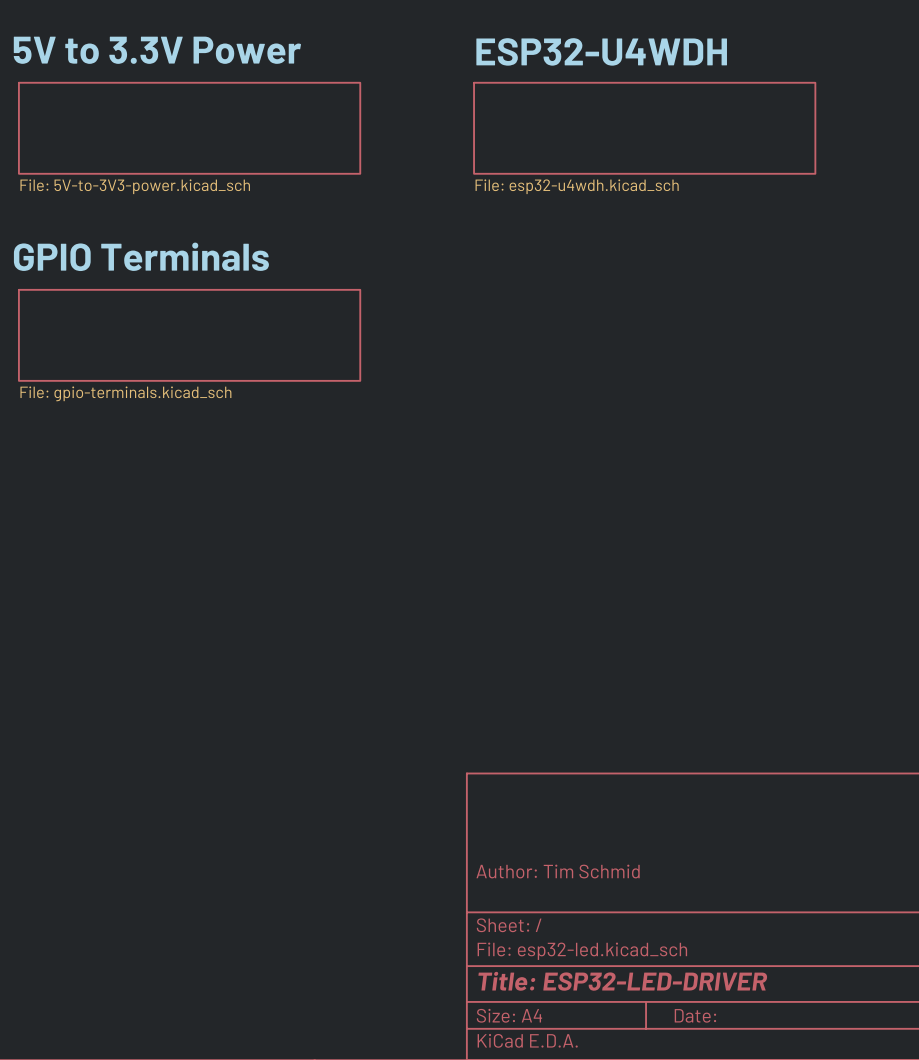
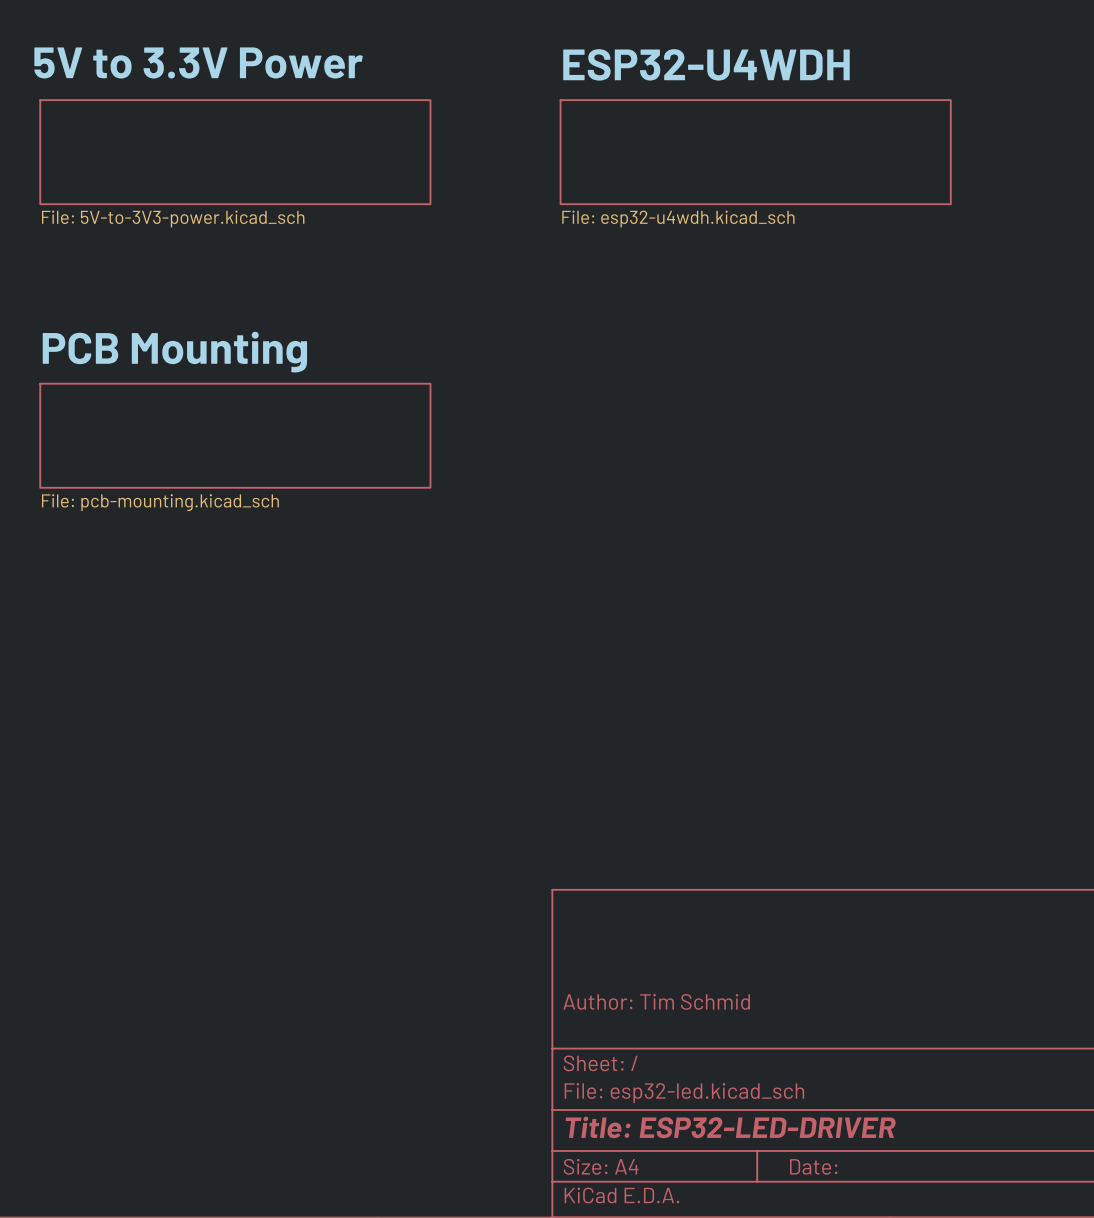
sheet GPIO Terminals: File: gpio-terminals.kicad_sch (189, 335) -> none
sheet PCB Mounting: none -> File: pcb-mounting.kicad_sch (235, 435)

